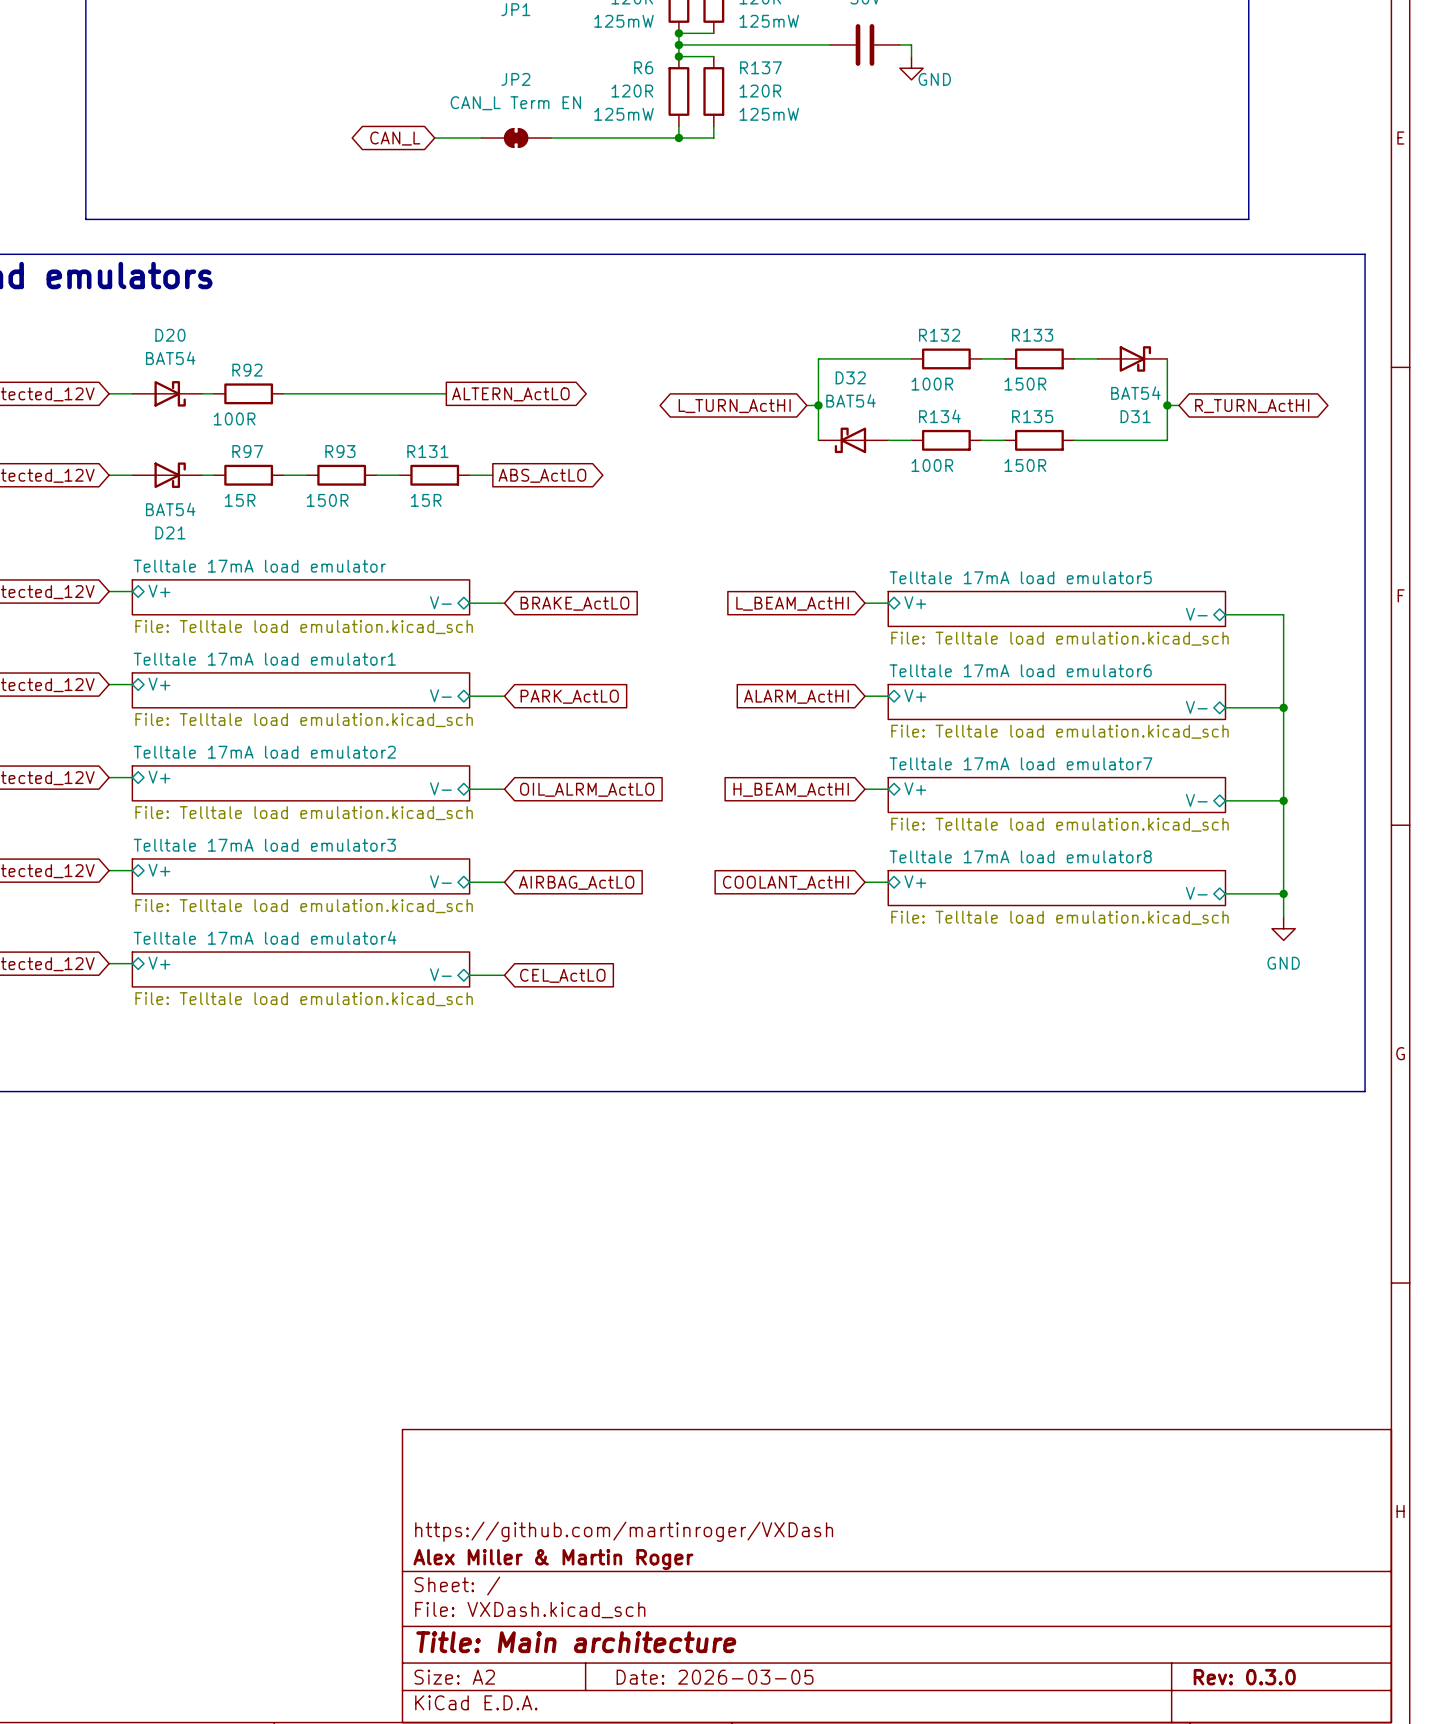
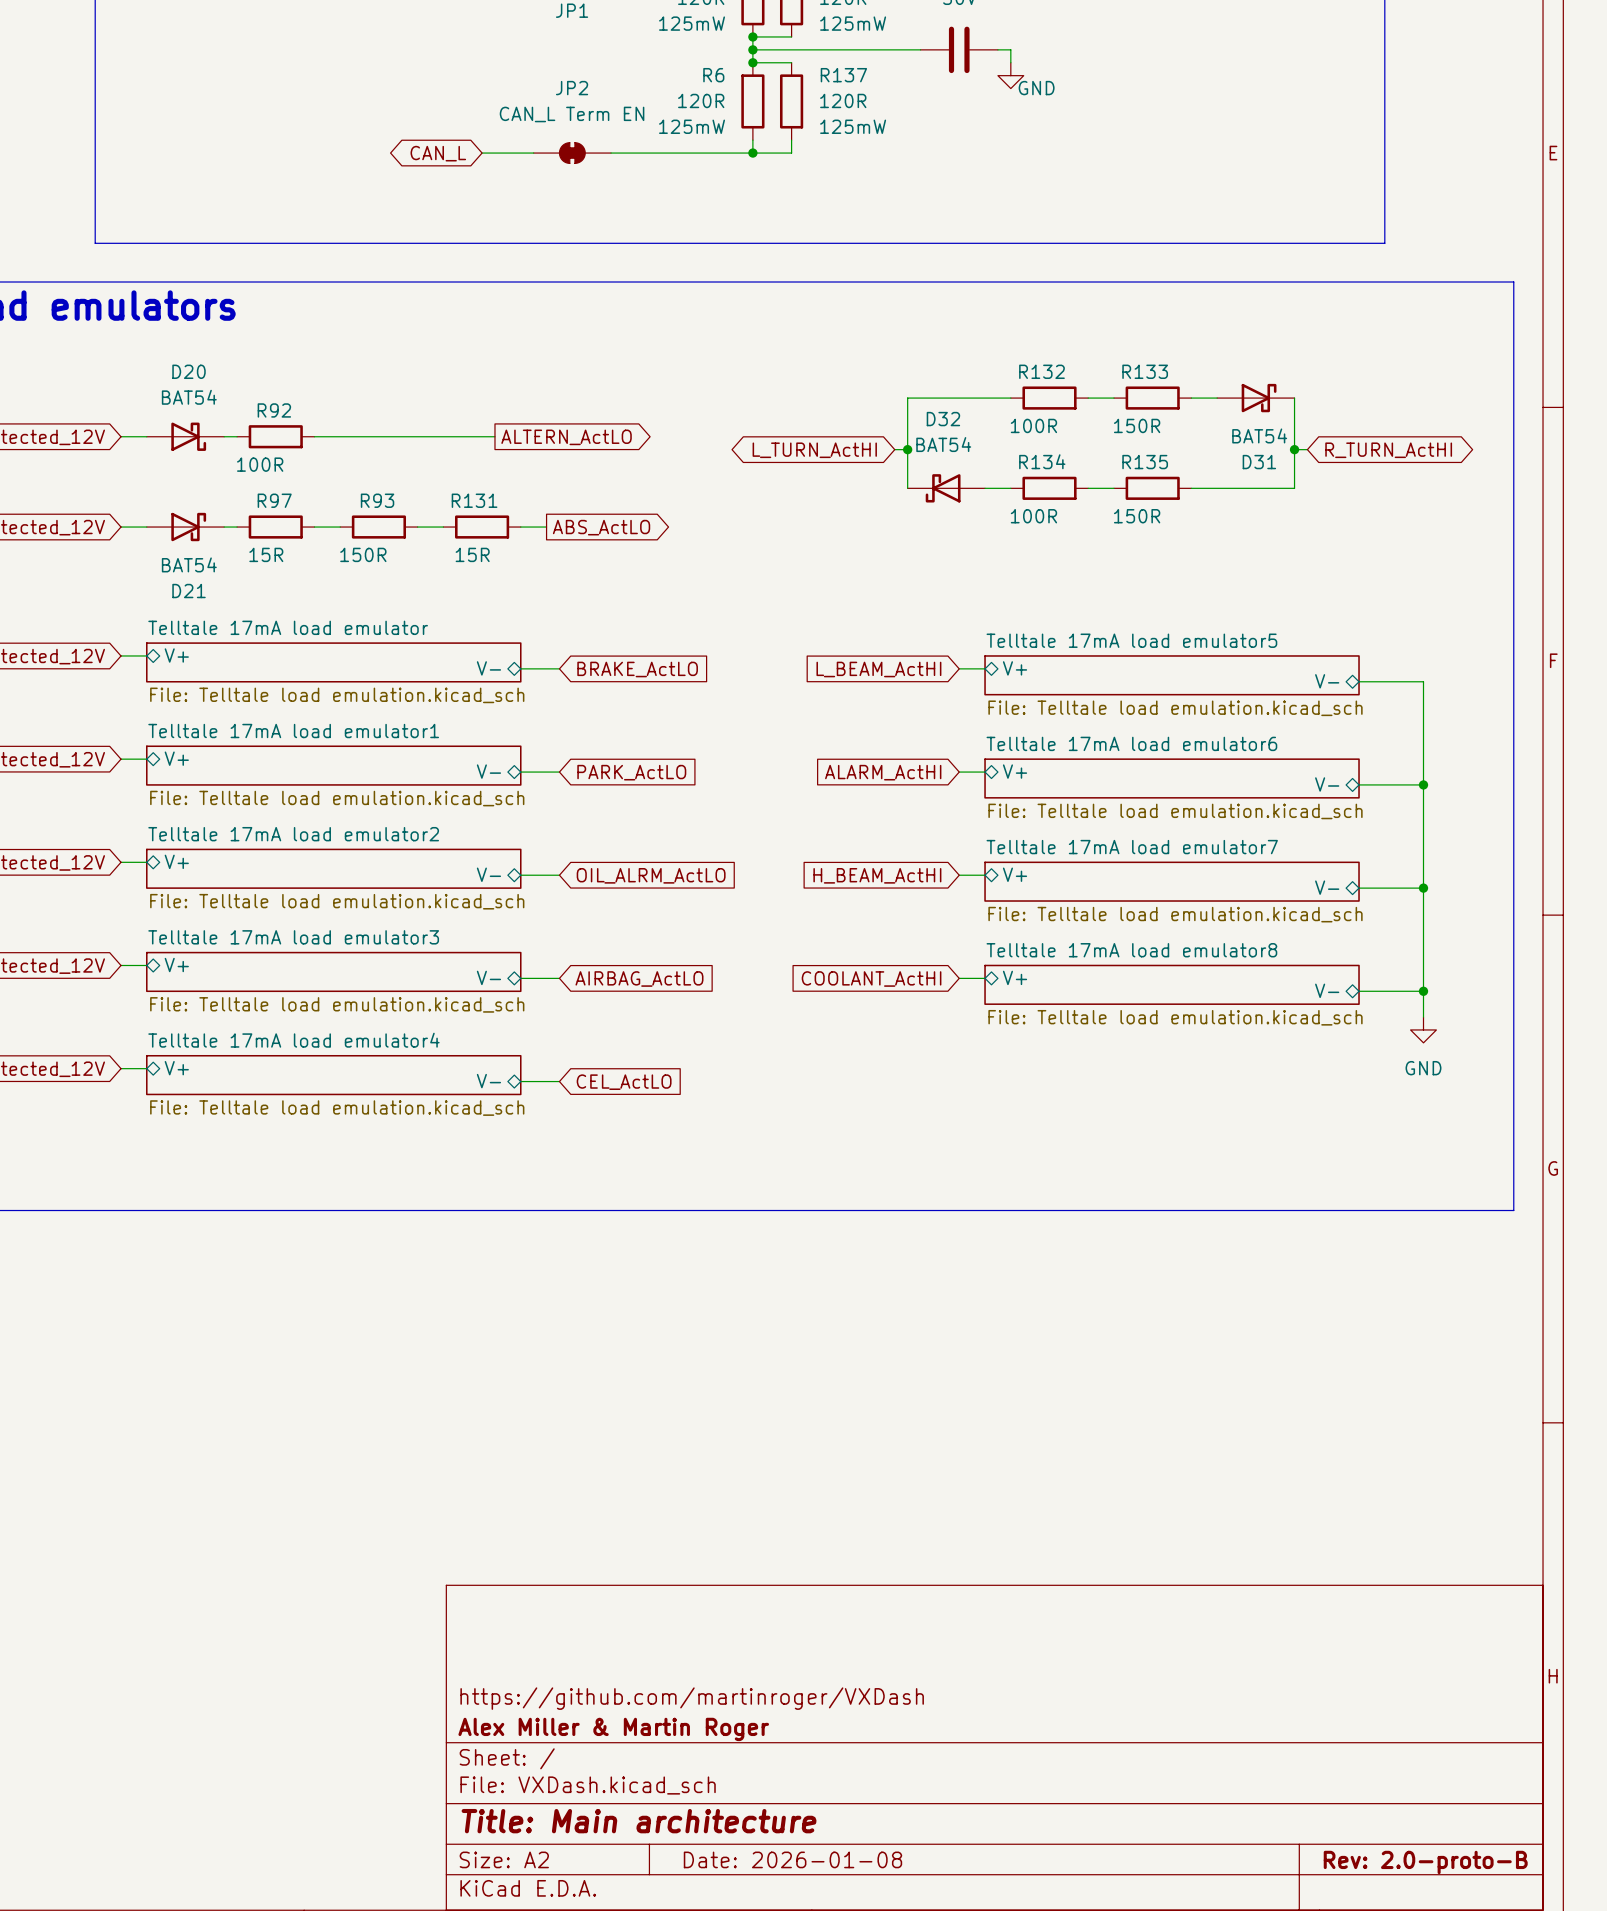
title block: Date: 2026-03-05 (715, 1677) -> Date: 2026-01-08 (792, 1859)
title block: Rev: 0.3.0 (1244, 1677) -> Rev: 2.0-proto-B (1425, 1862)

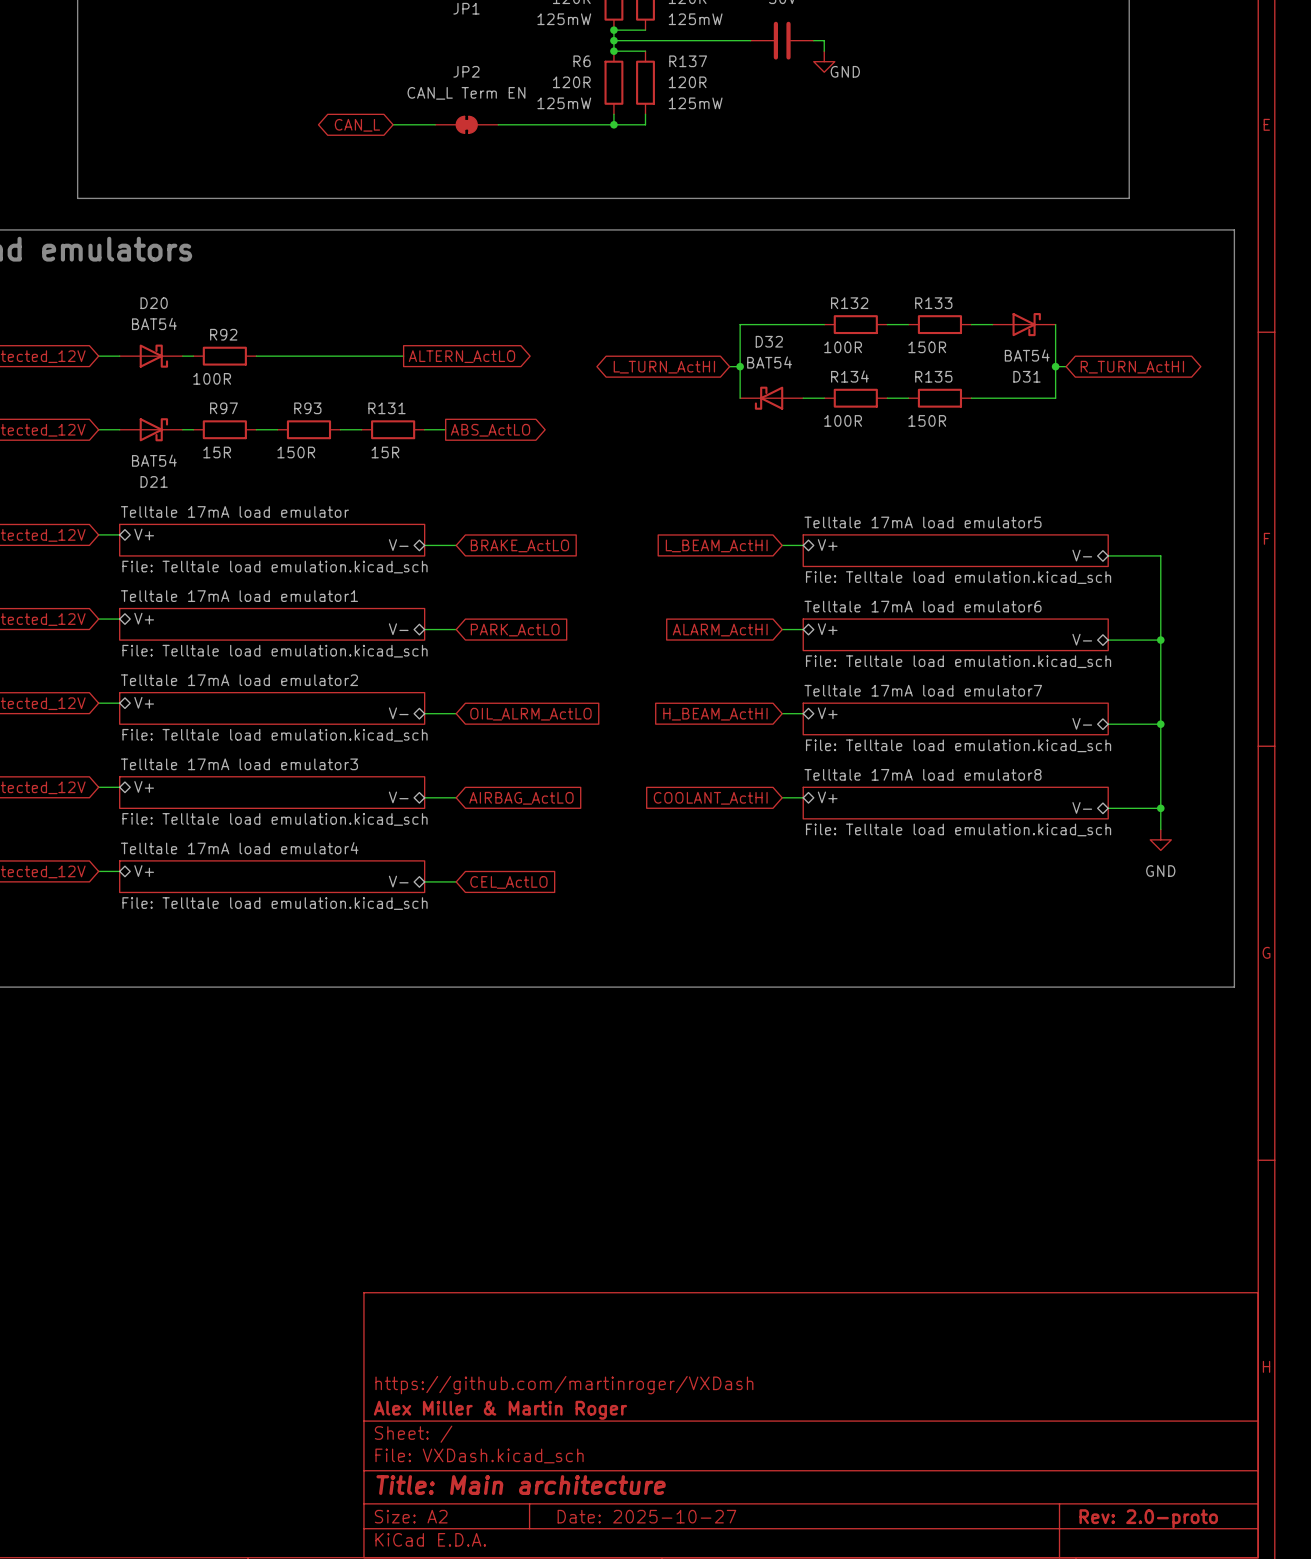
title block: Date: 2026-01-08 (792, 1859) -> Date: 2025-10-27 (646, 1516)
title block: Rev: 2.0-proto-B (1425, 1862) -> Rev: 2.0-proto (1148, 1518)

